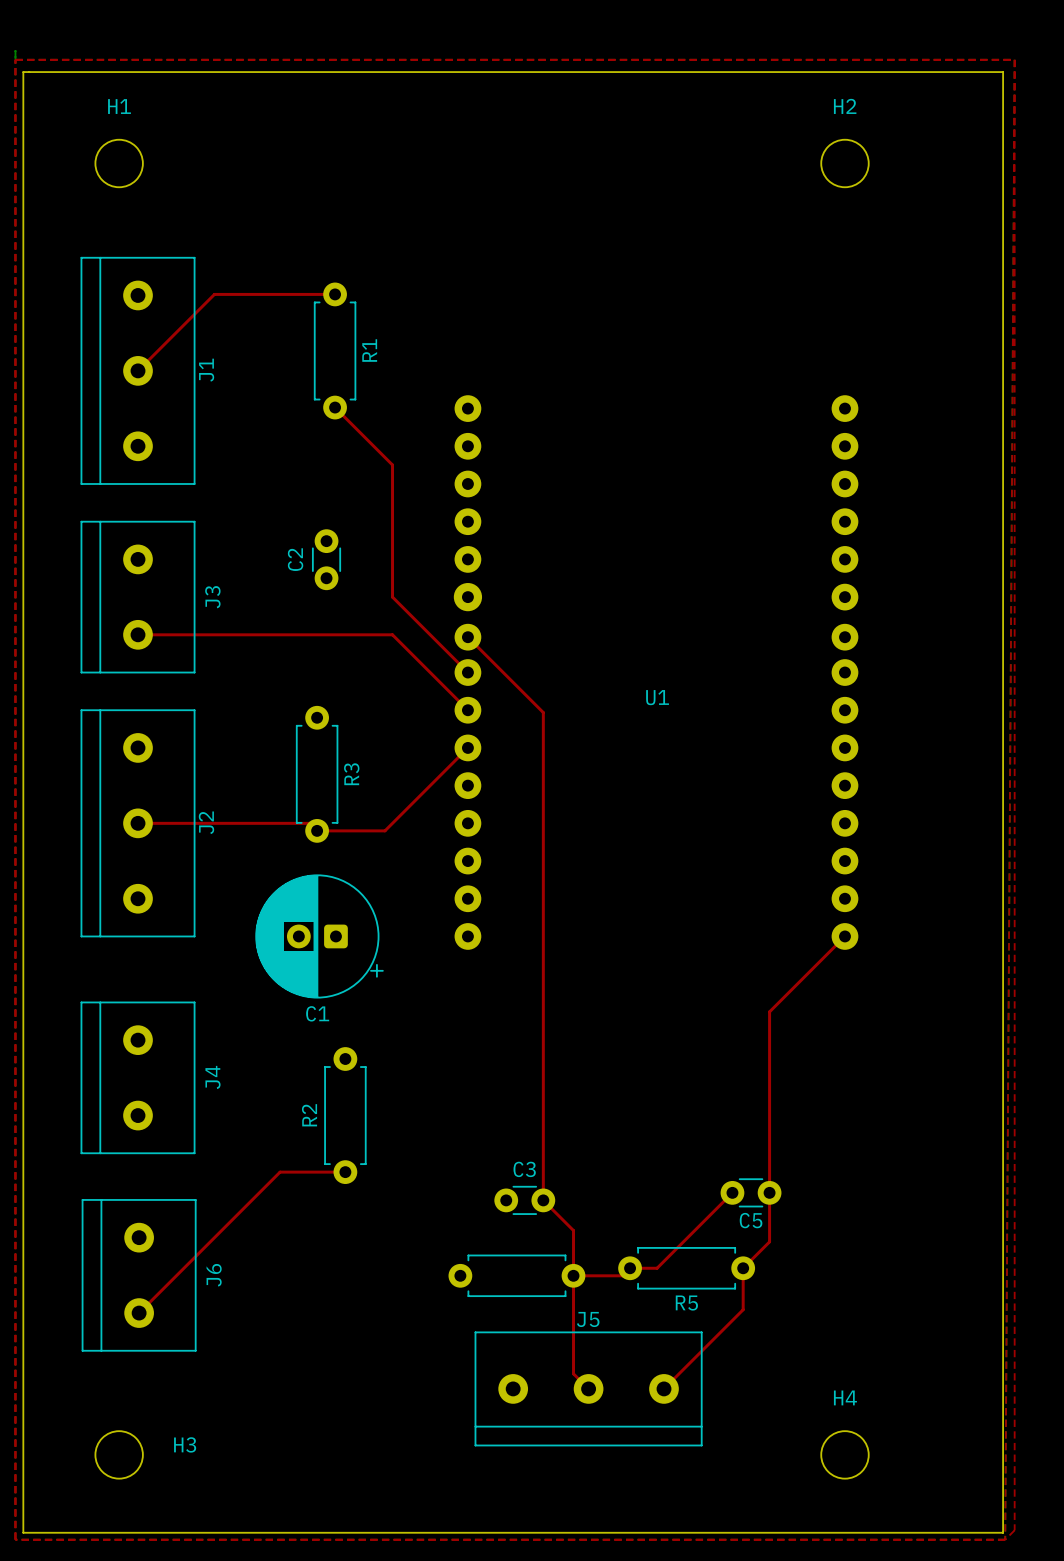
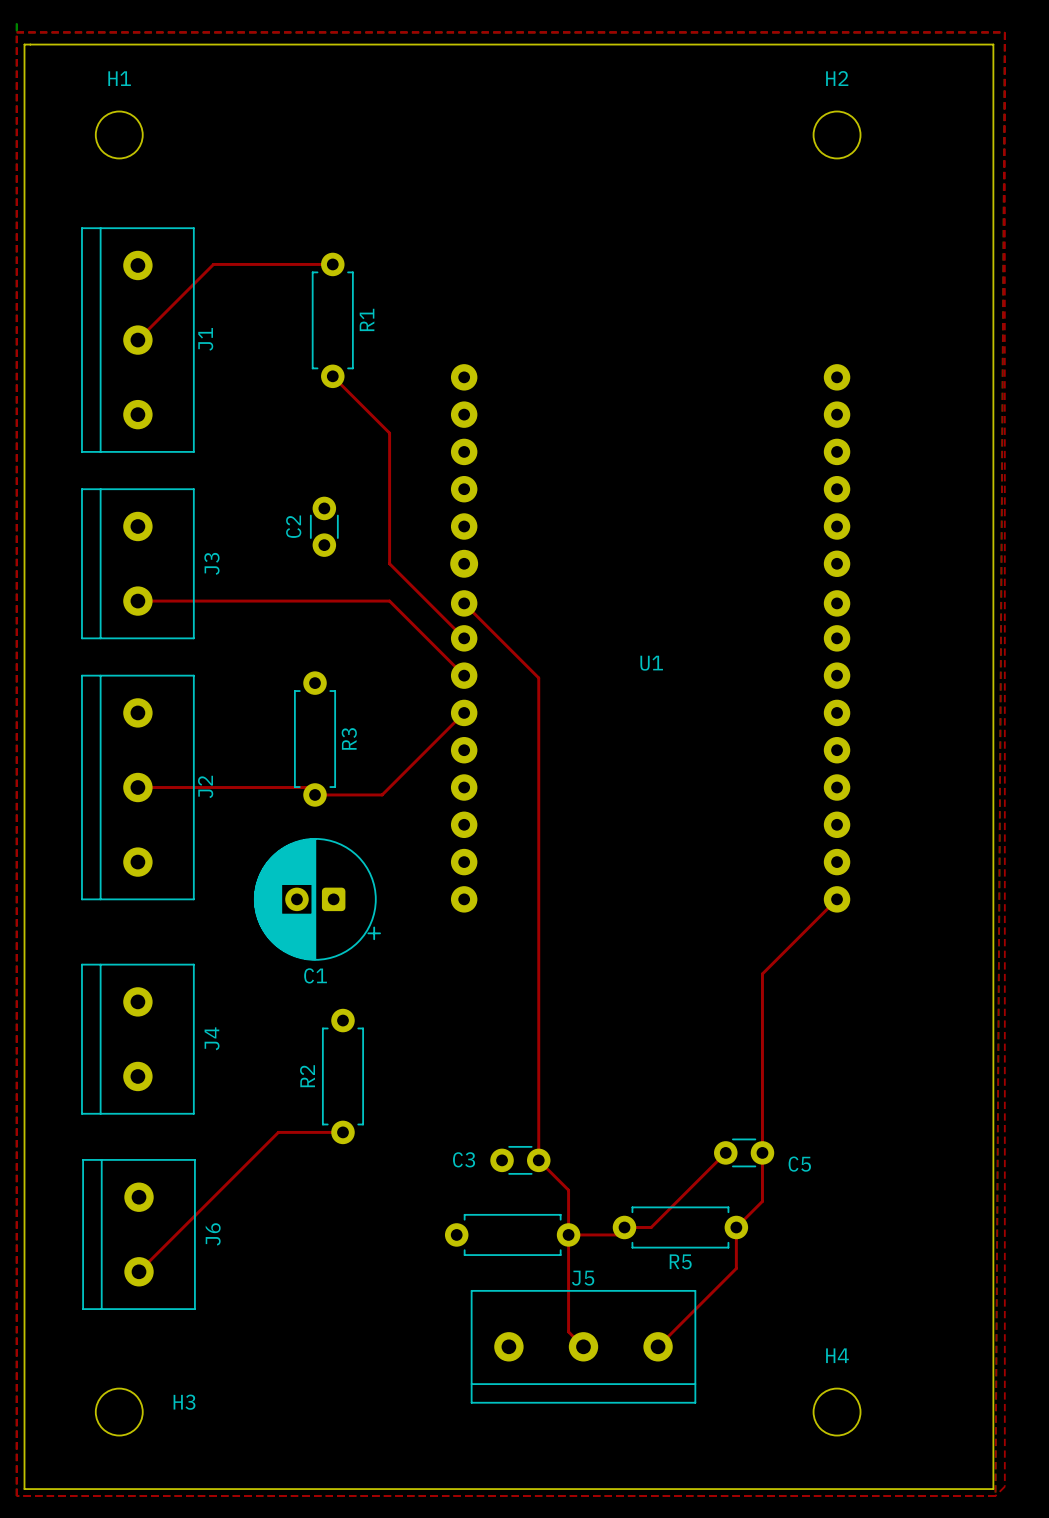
C3 name position: C3 (524, 1169) -> C3 (464, 1159)
C5 name position: C5 (751, 1220) -> C5 (799, 1164)

